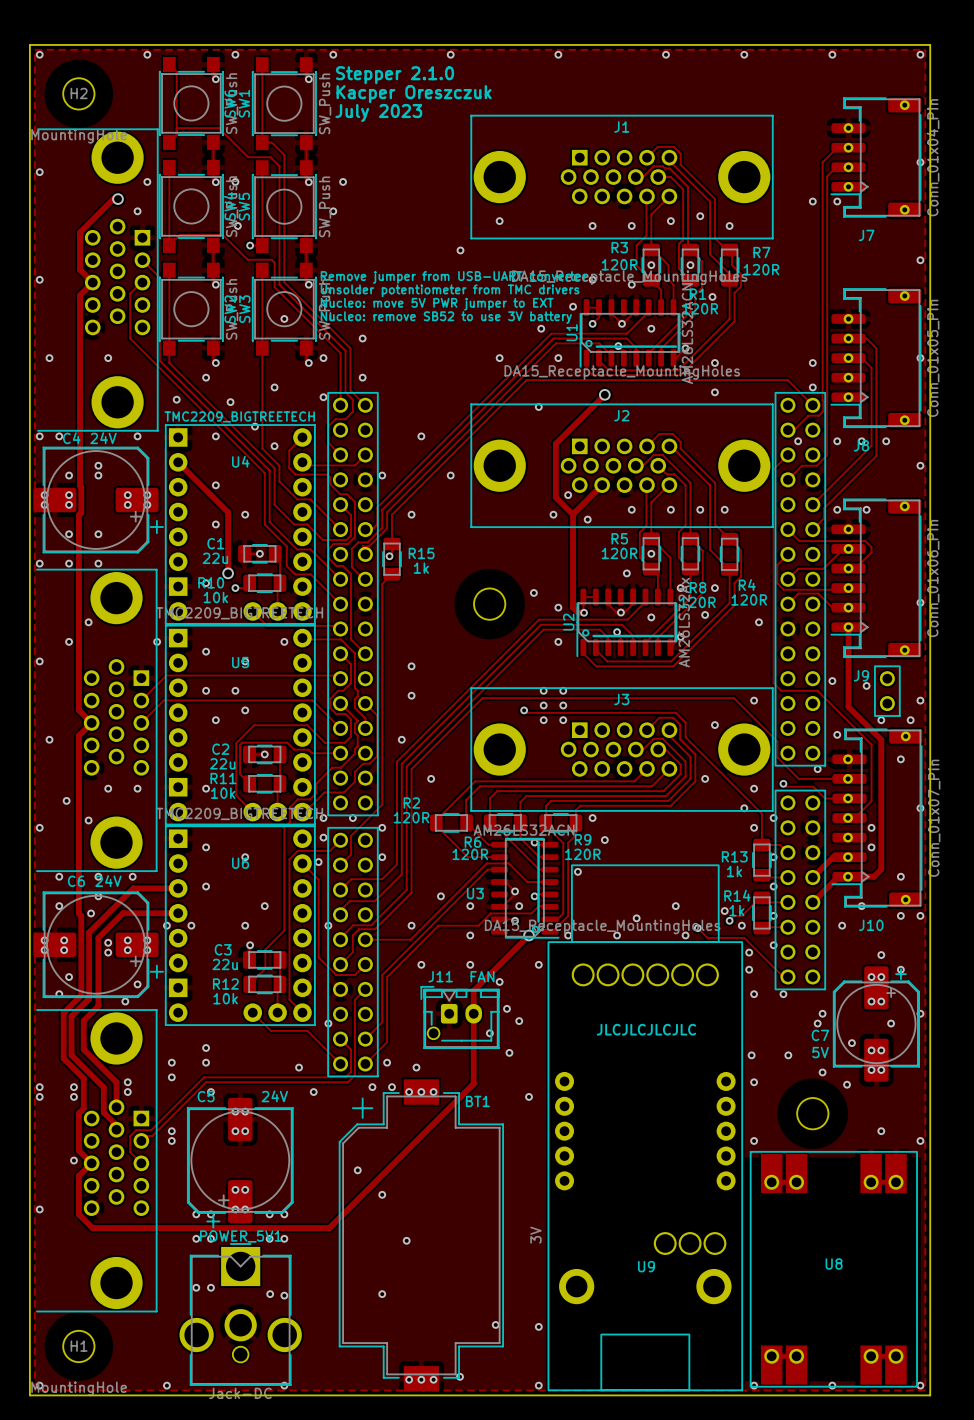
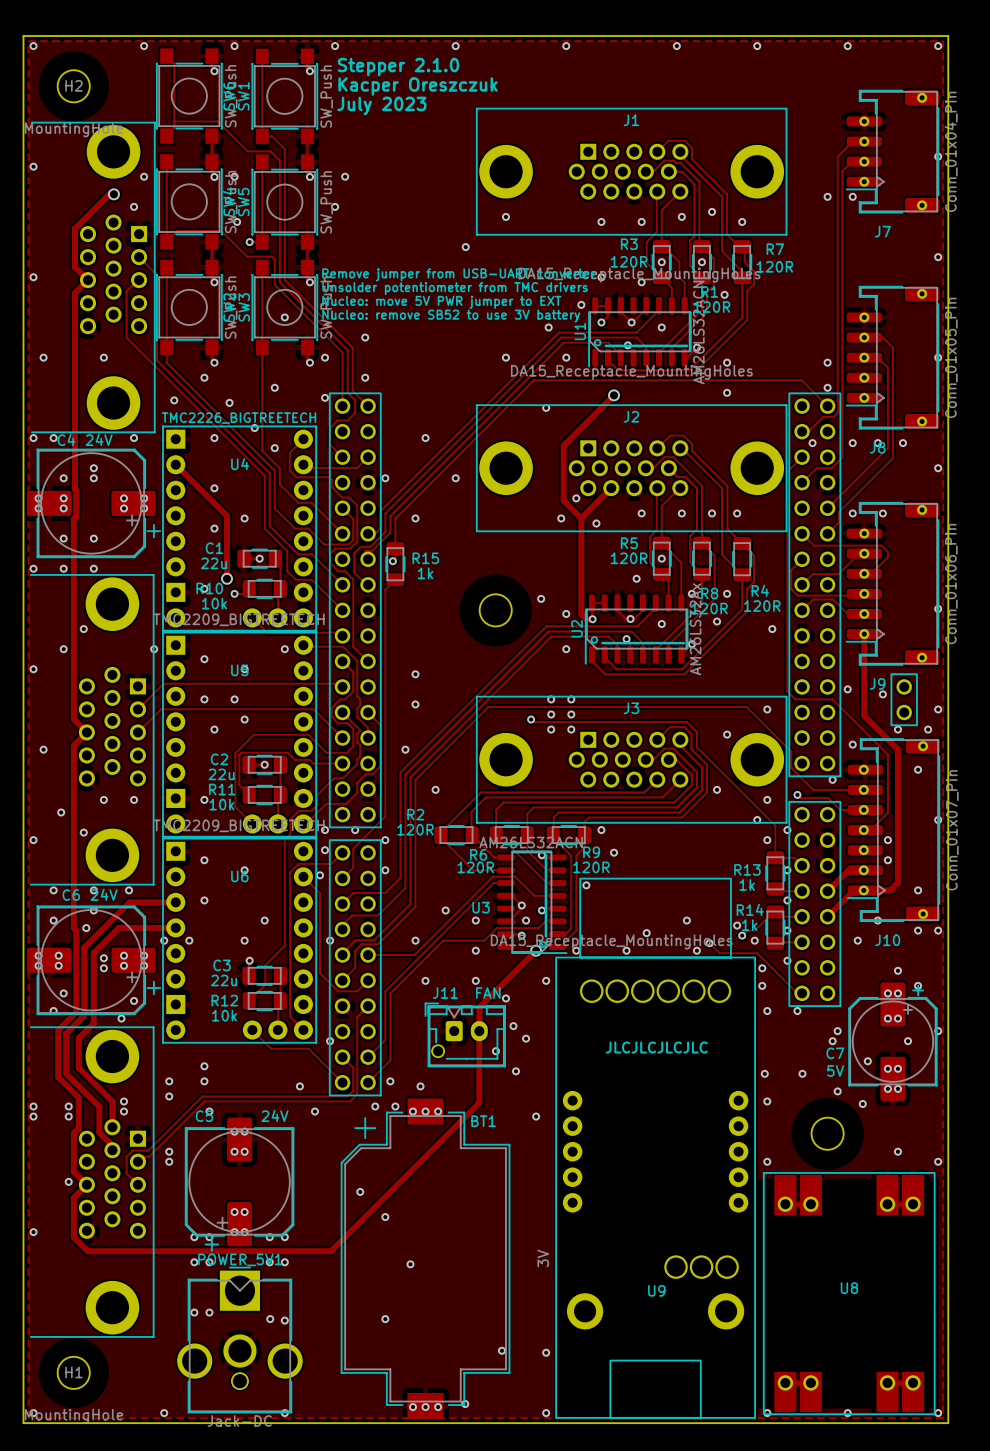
U4 value: TMC2209_BIGTREETECH (239, 416) -> TMC2226_BIGTREETECH (238, 418)

